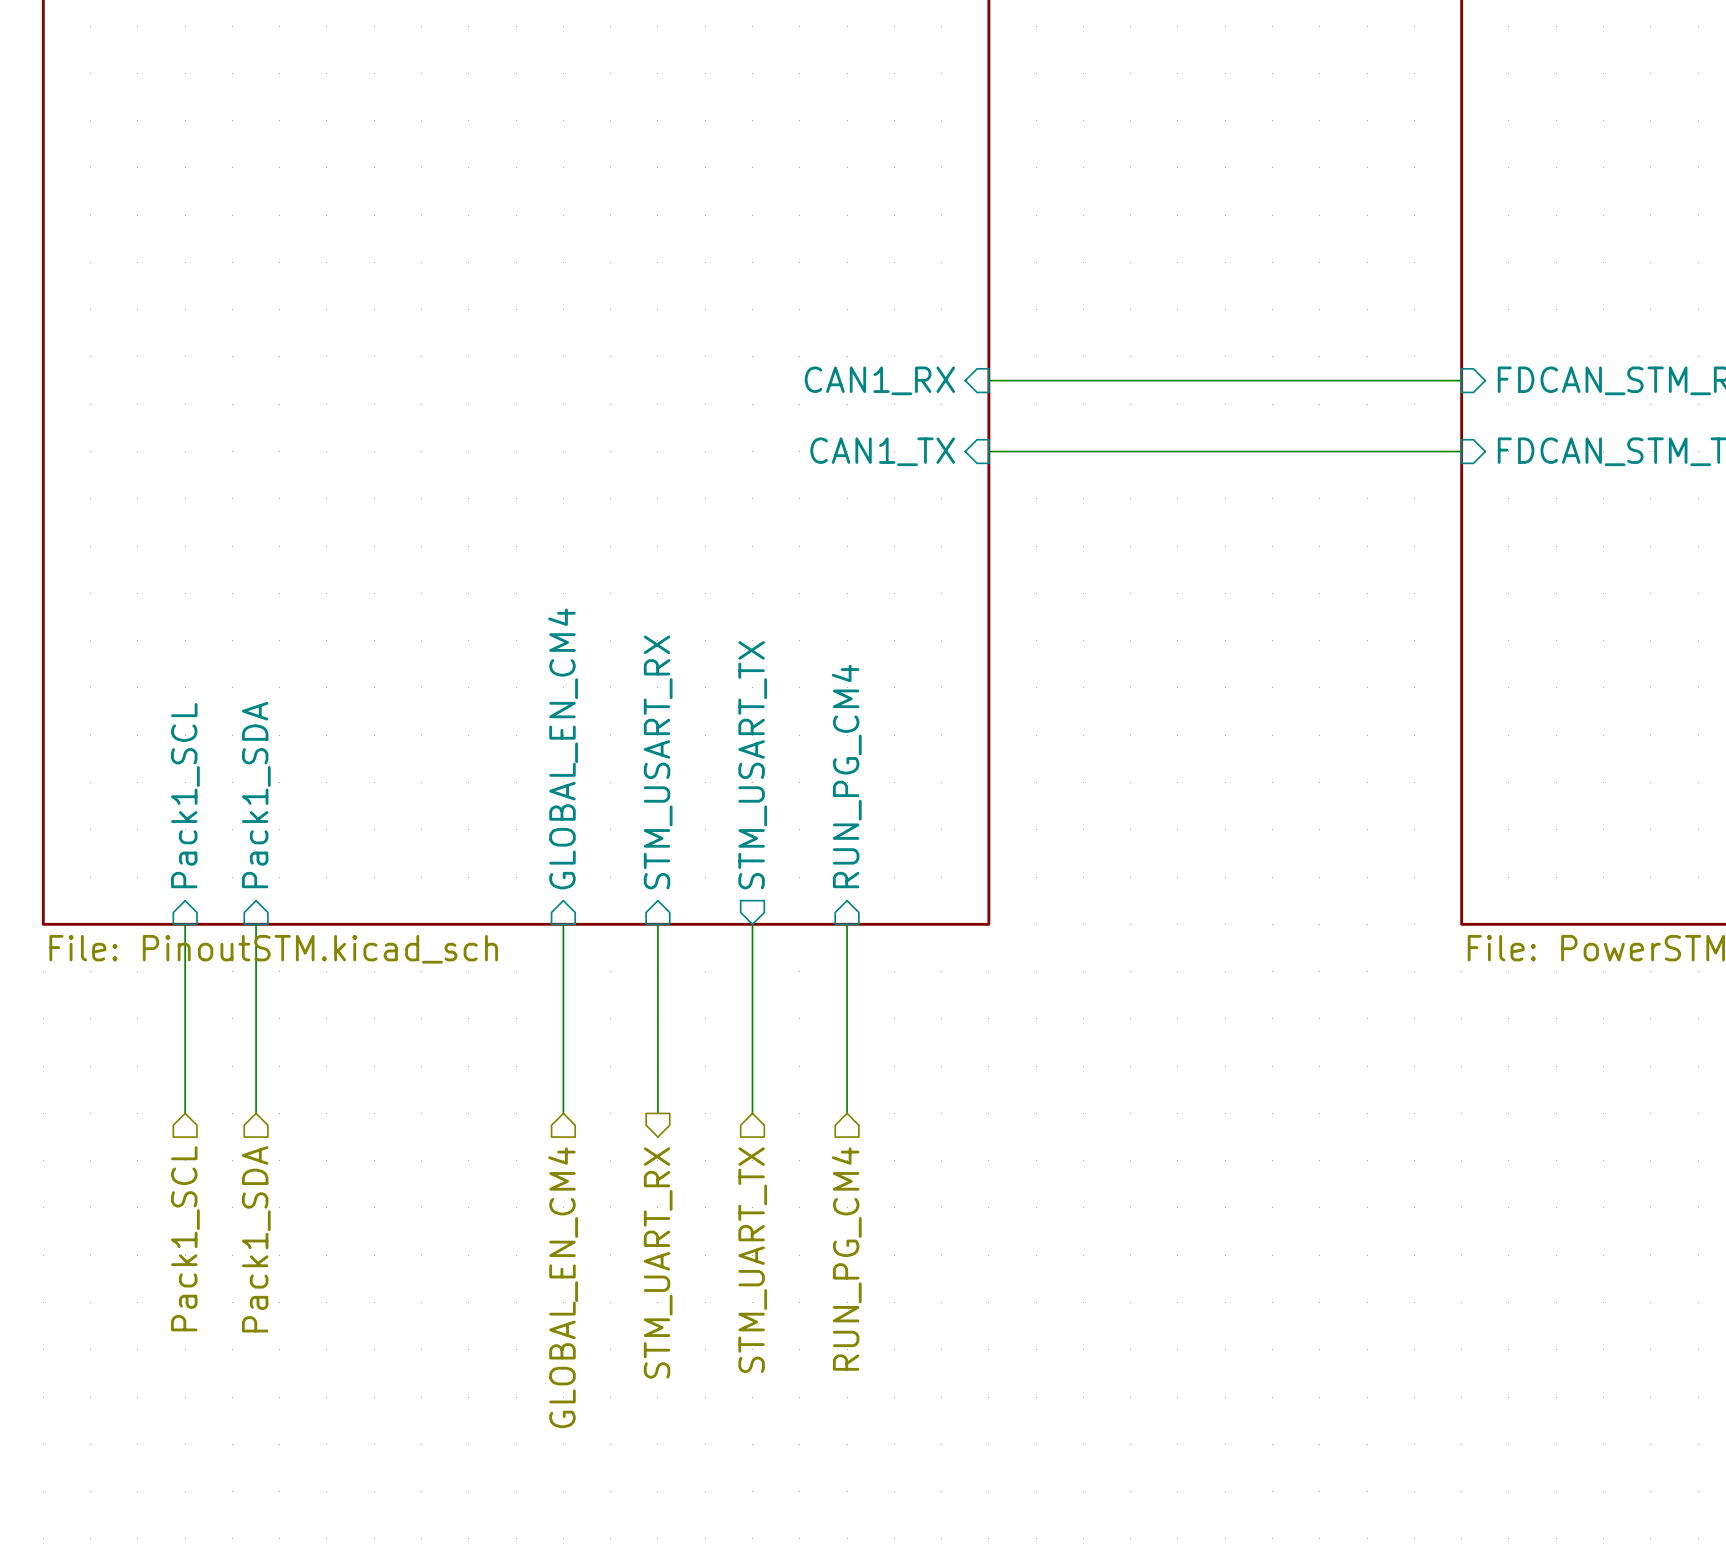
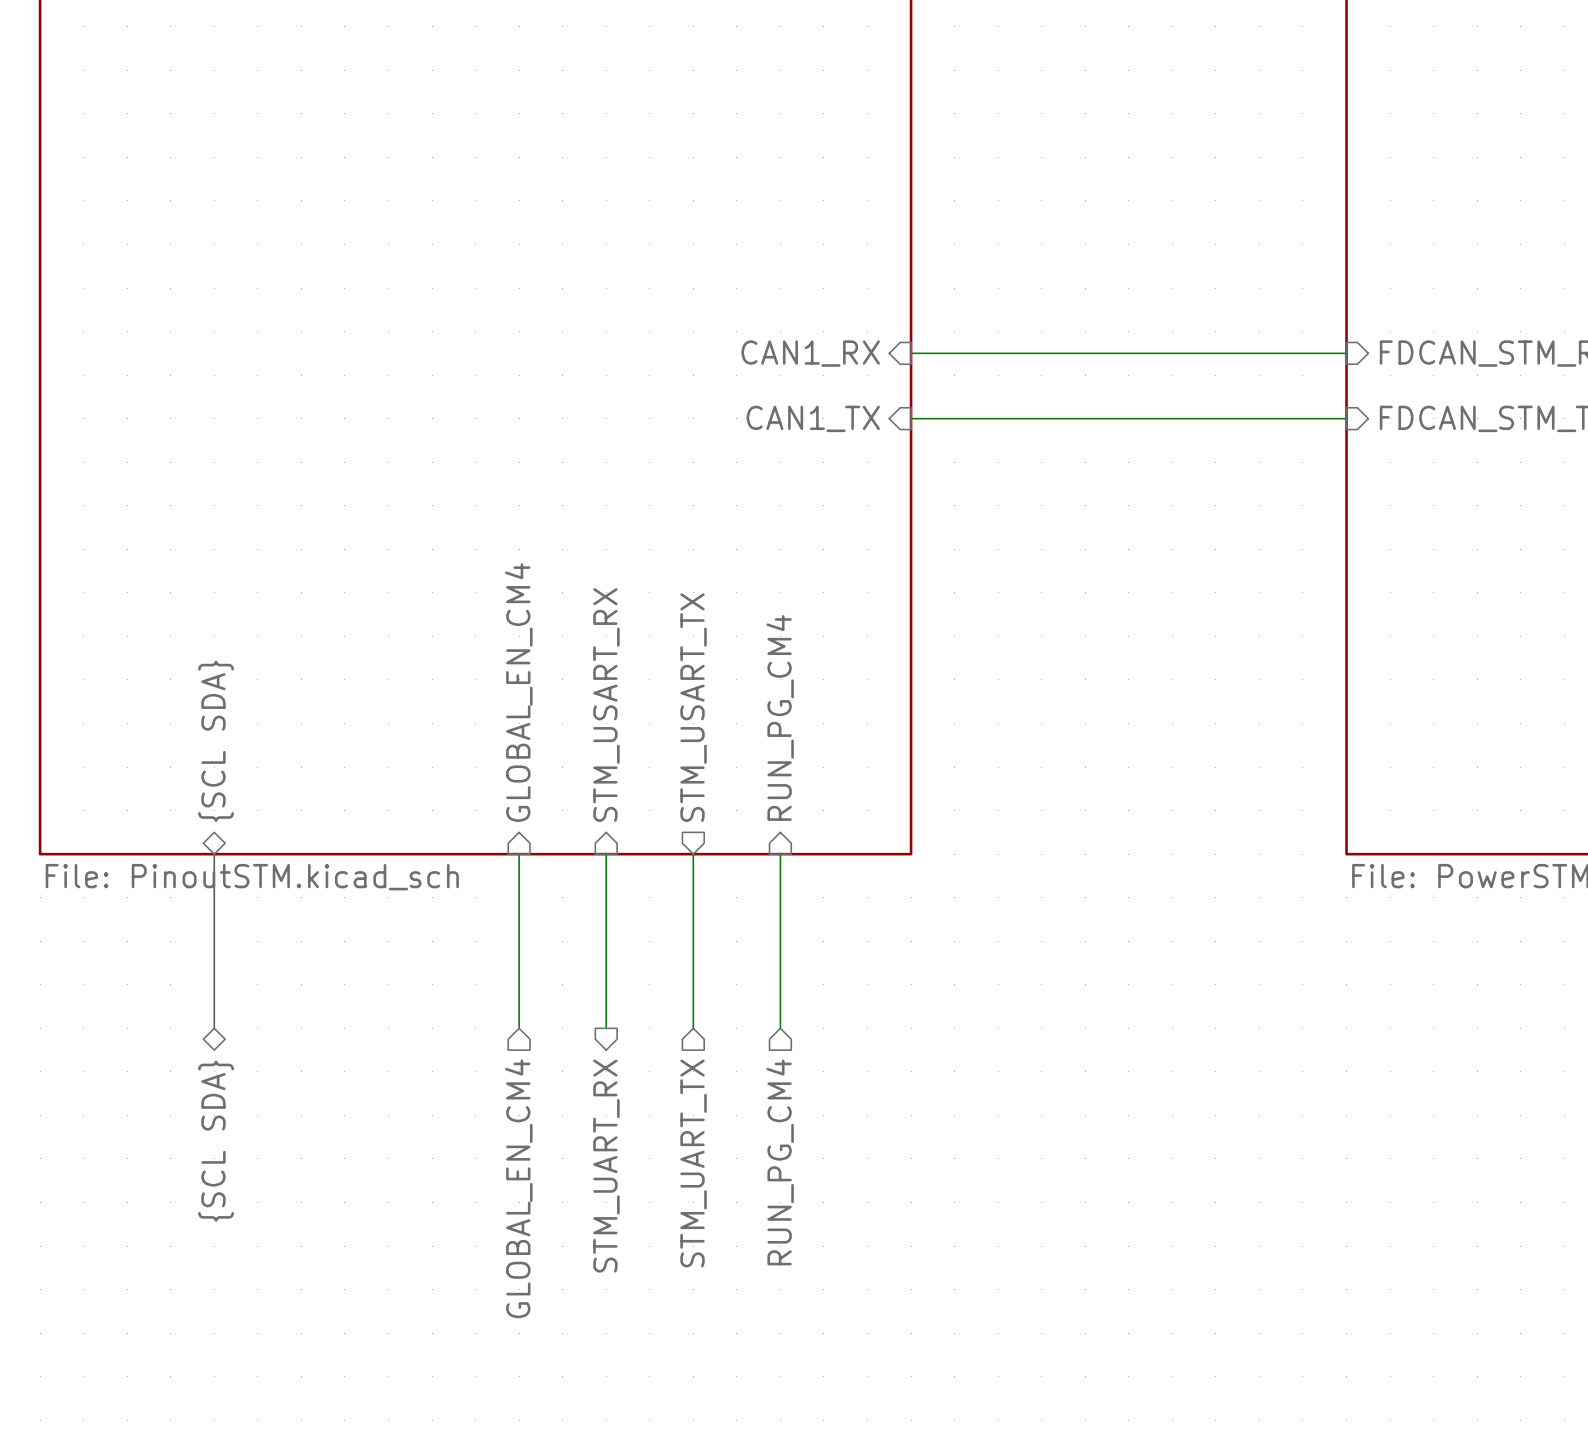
sheet pin: Pack1_SCL (185, 795) -> none
sheet pin: Pack1_SDA (256, 795) -> none
sheet pin: none -> {SCL SDA} (216, 741)
wire: (185, 924) (185, 1113) -> none
bus: none -> (214, 854) (214, 1028)
wire: (256, 924) (256, 1113) -> none
hierarchical label: none -> {SCL SDA} (216, 1141)
hierarchical label: Pack1_SCL (185, 1238) -> none
hierarchical label: Pack1_SDA (256, 1239) -> none

